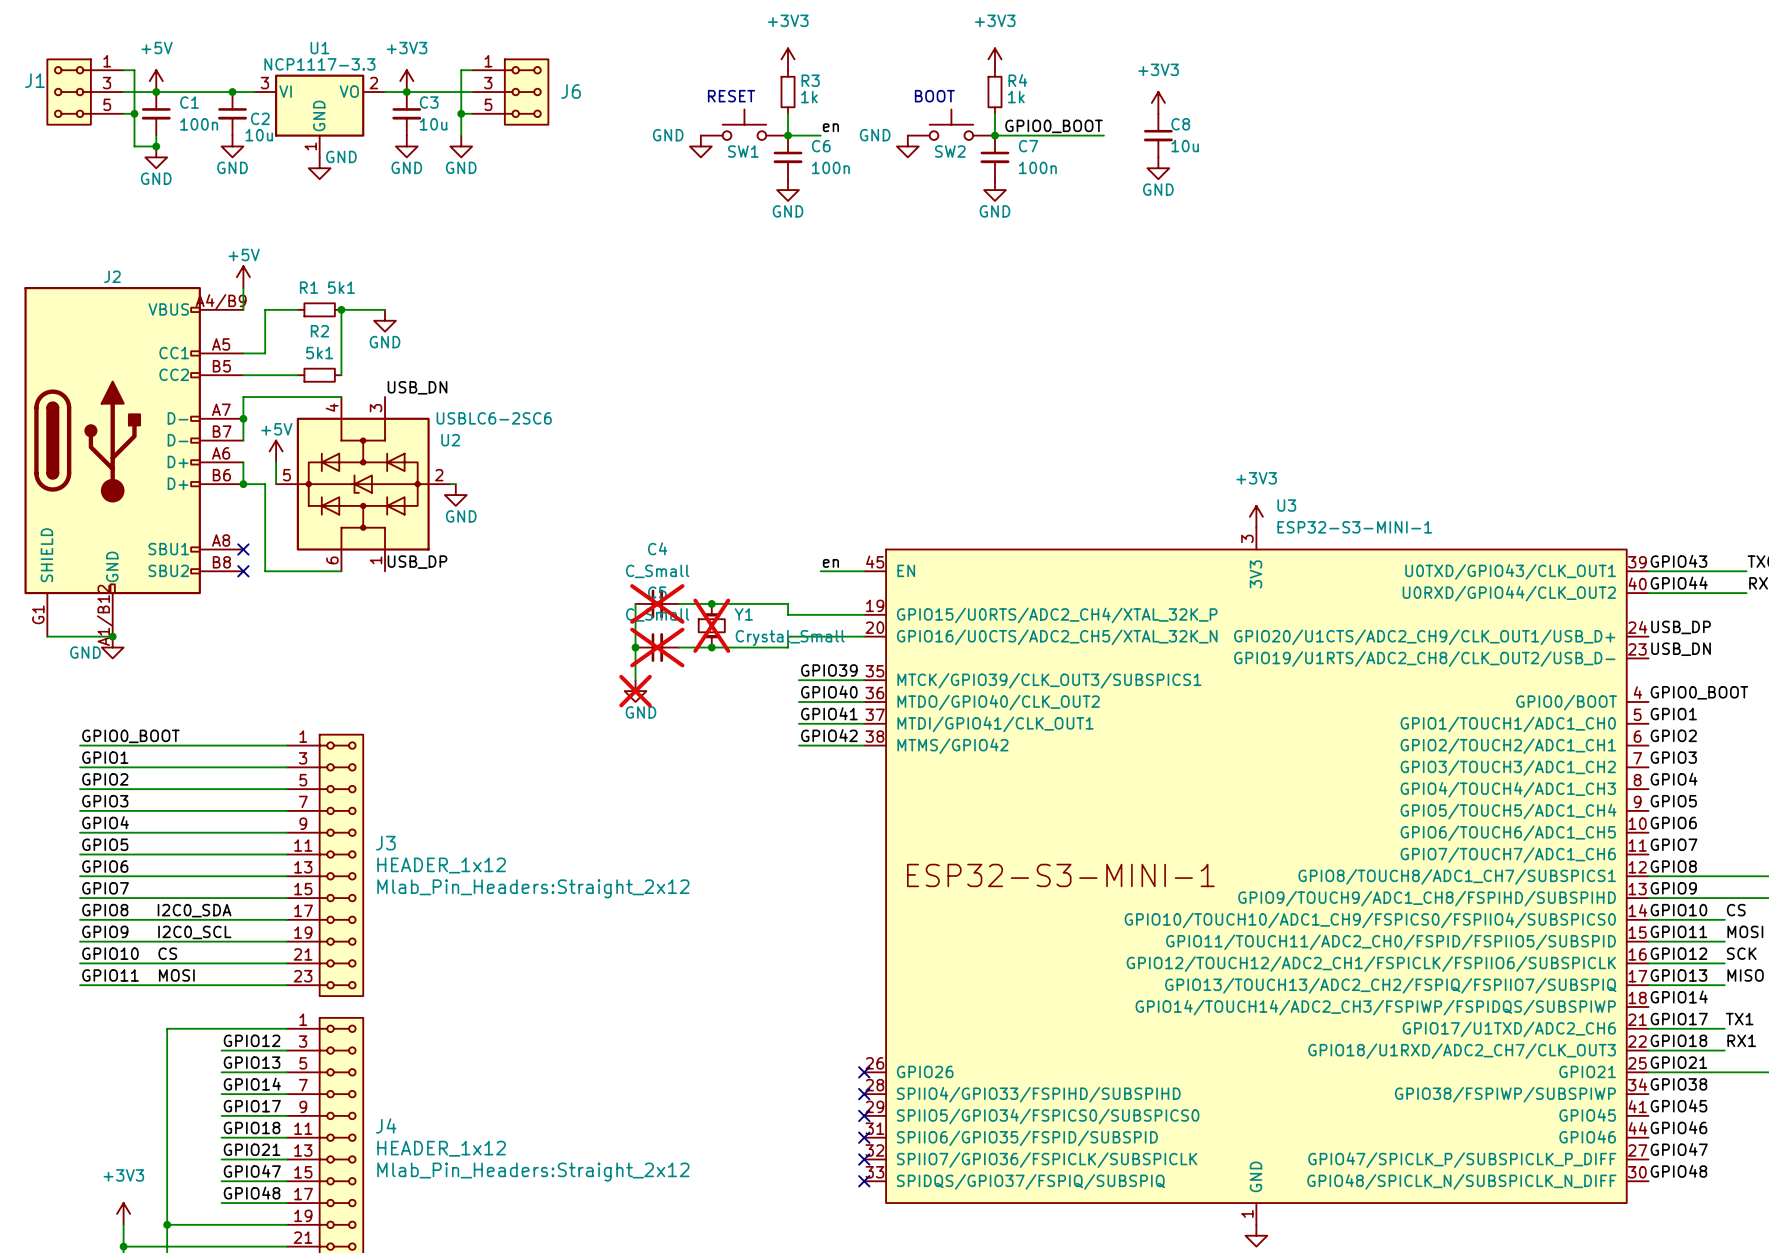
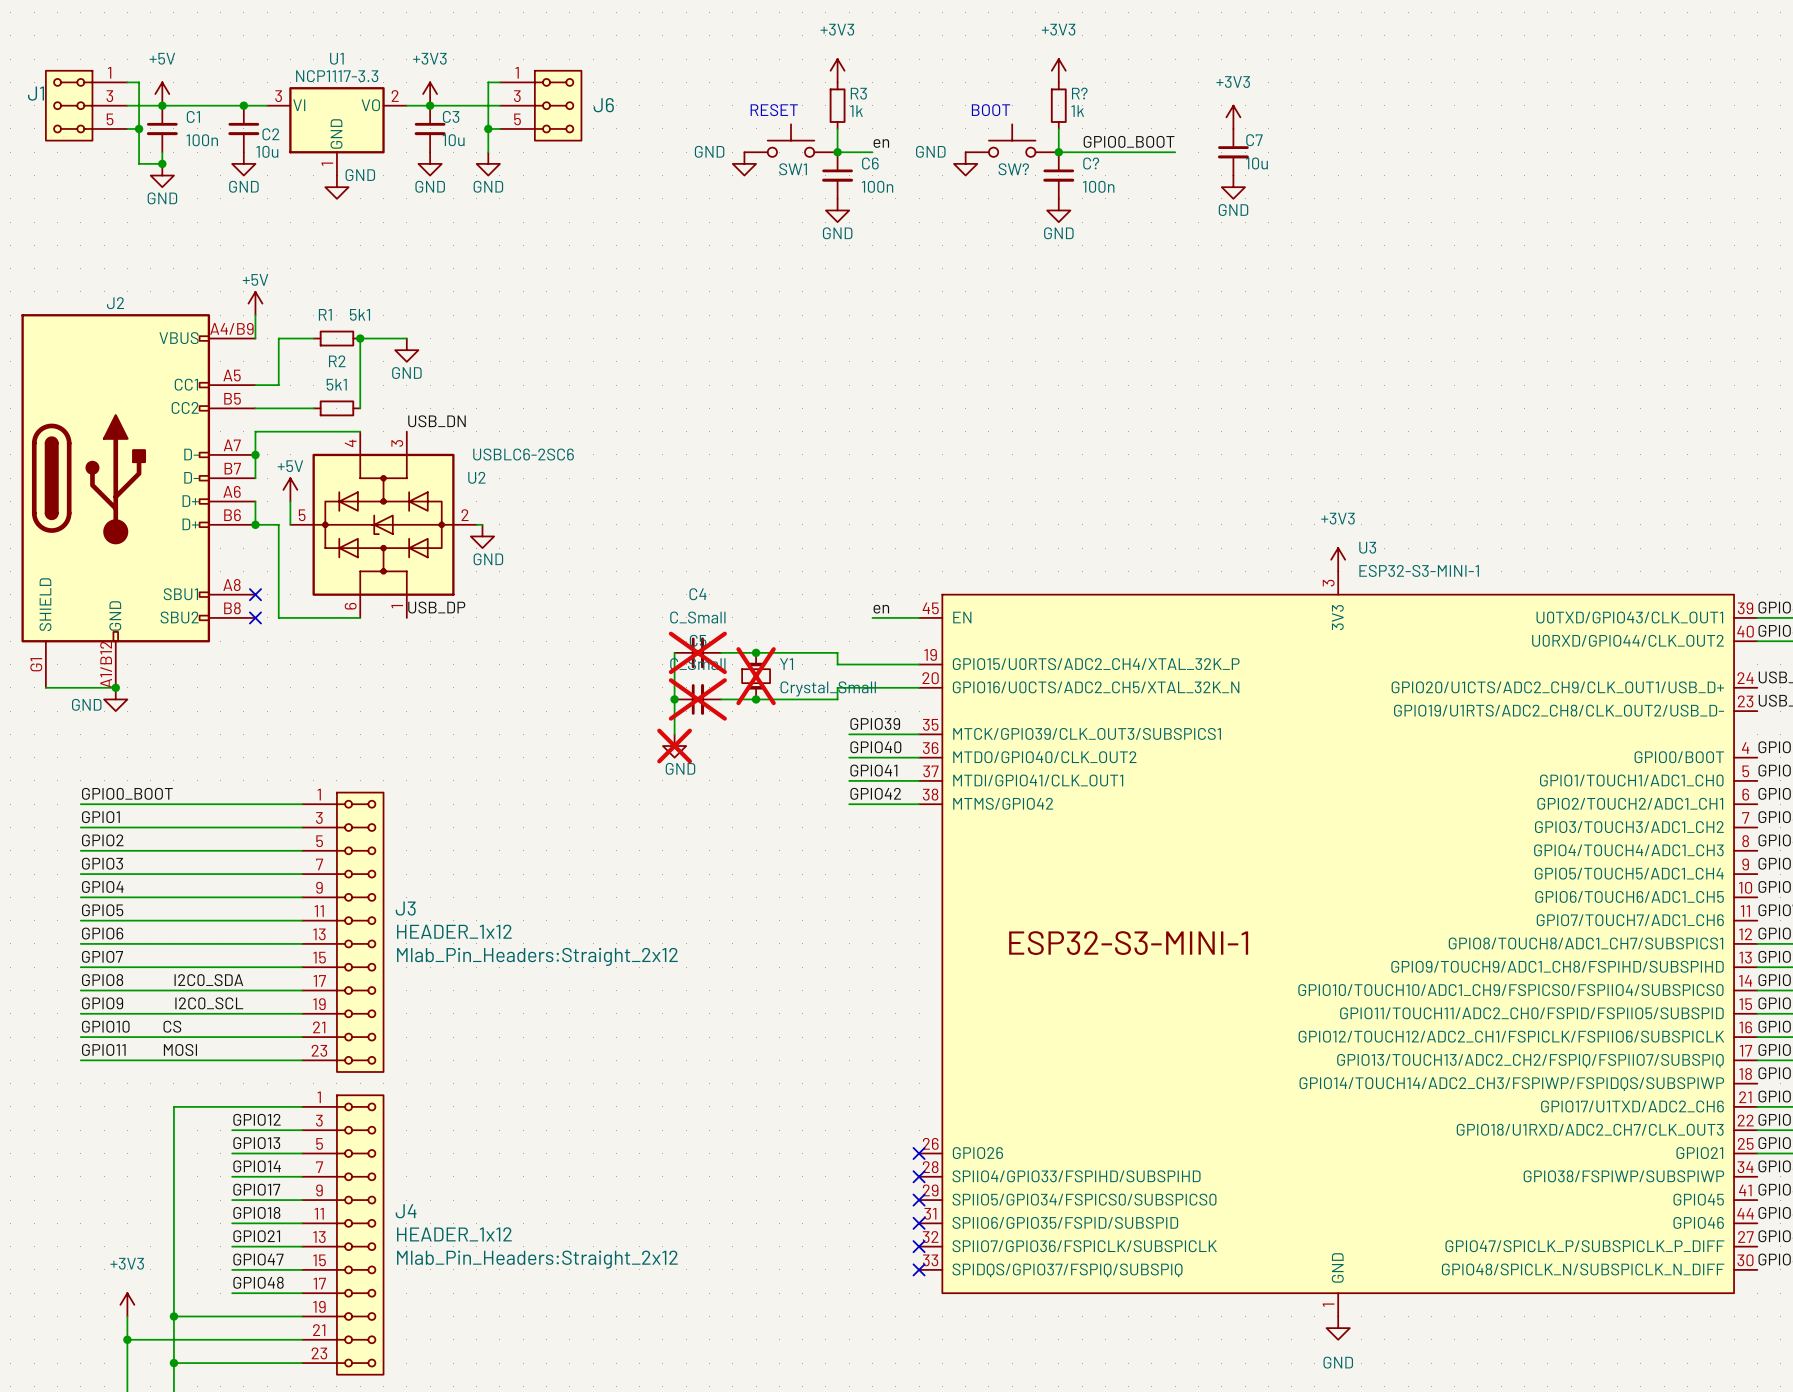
R4 name: R4 (1017, 80) -> R? (1079, 93)
C8 name: C8 (1180, 124) -> C7 (1254, 140)
C7 name: C7 (1028, 146) -> C? (1091, 163)
SW2 name: SW2 (950, 151) -> SW? (1013, 169)

